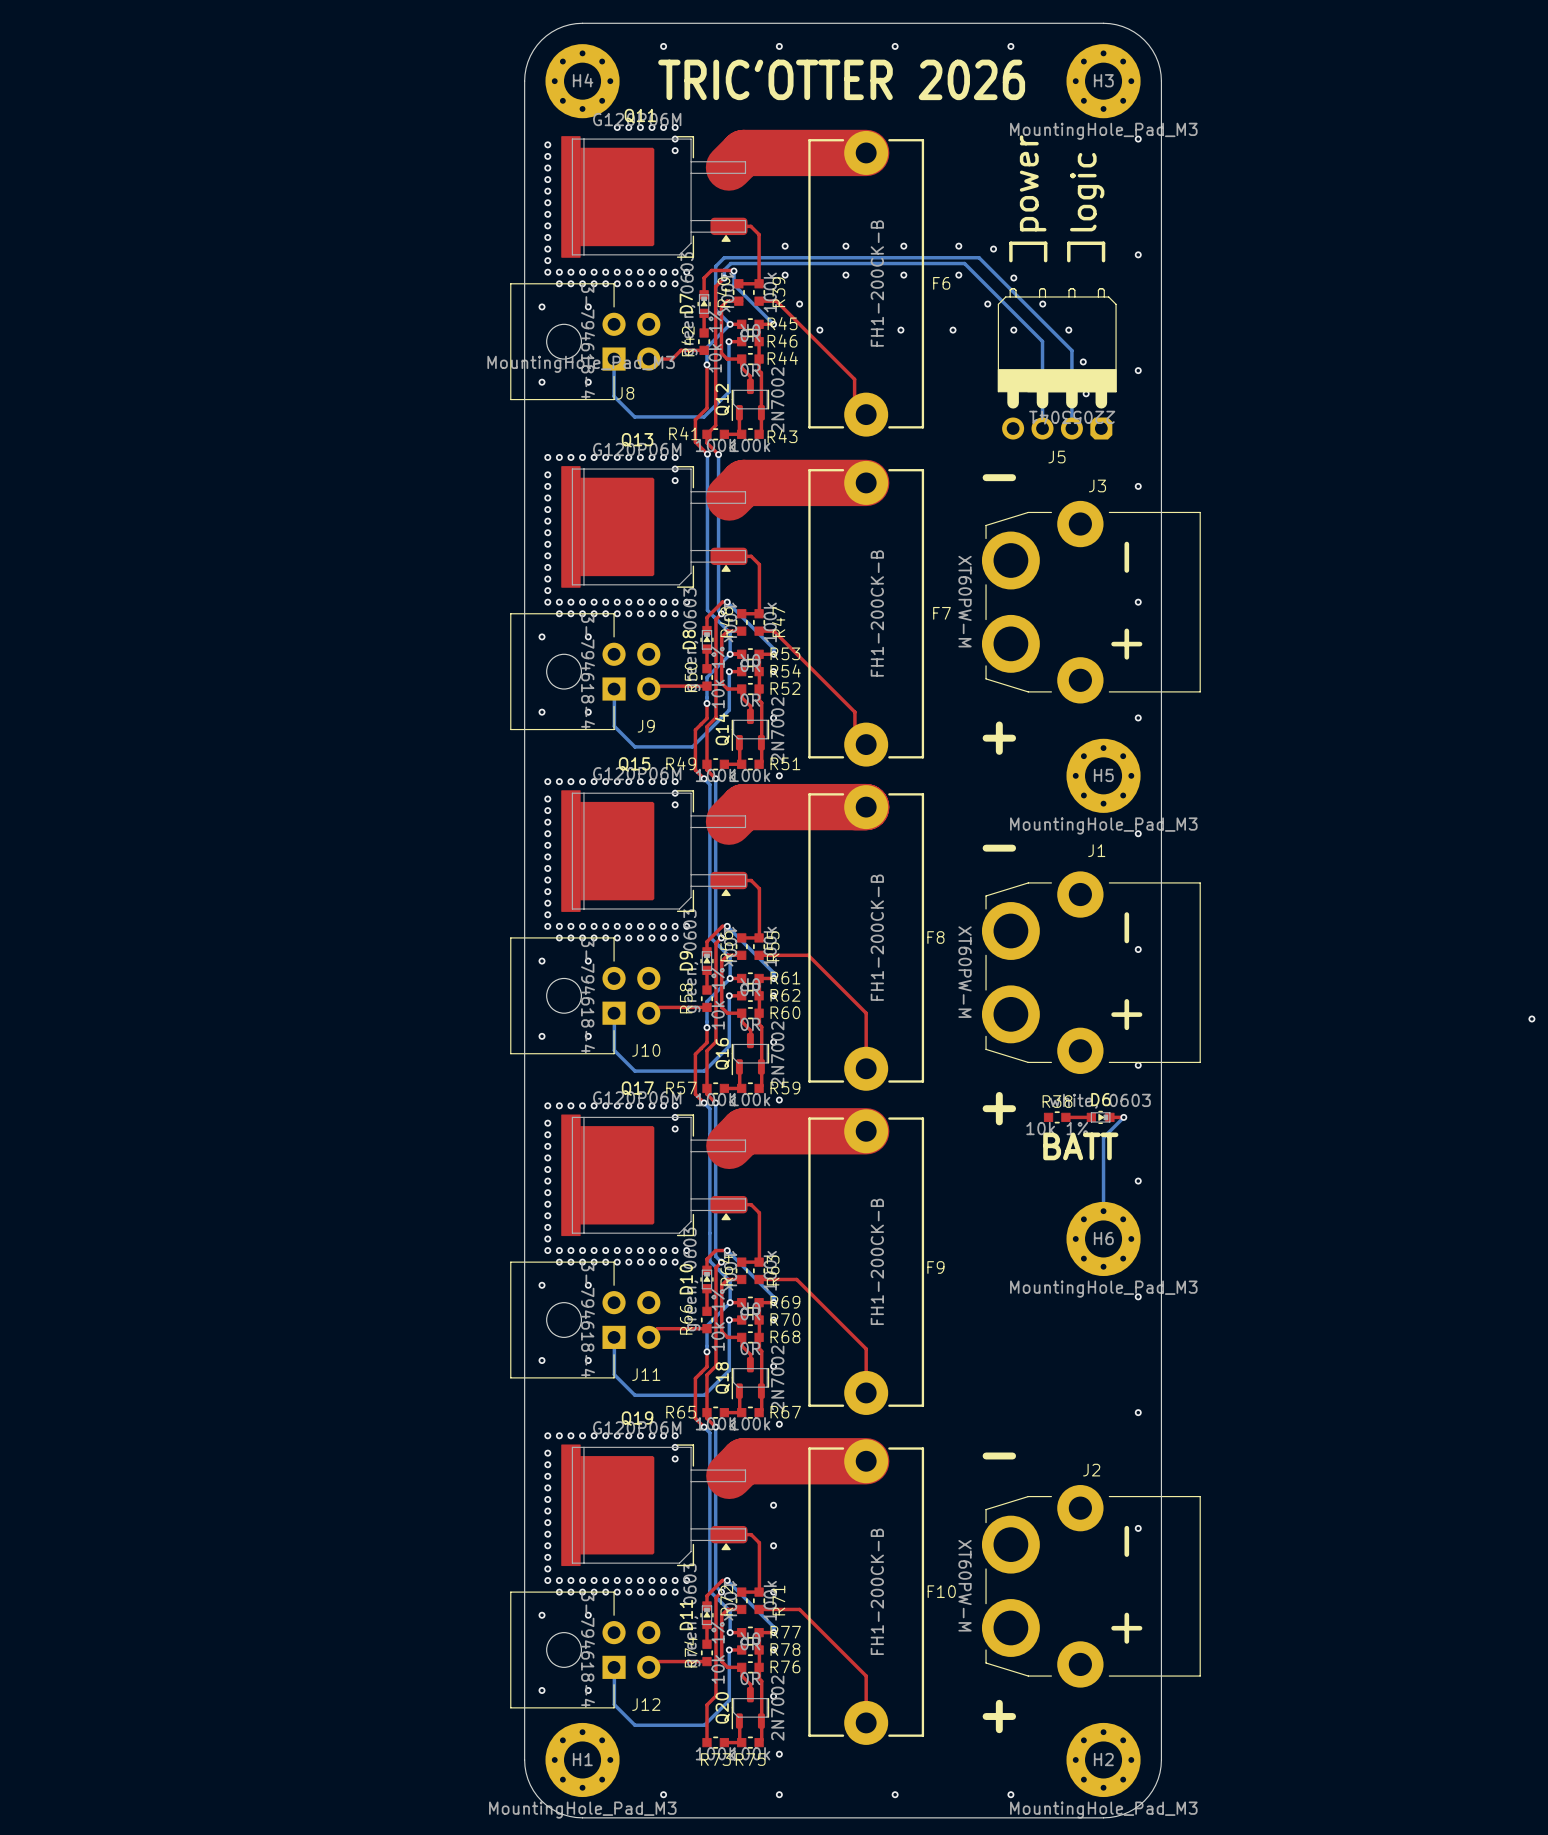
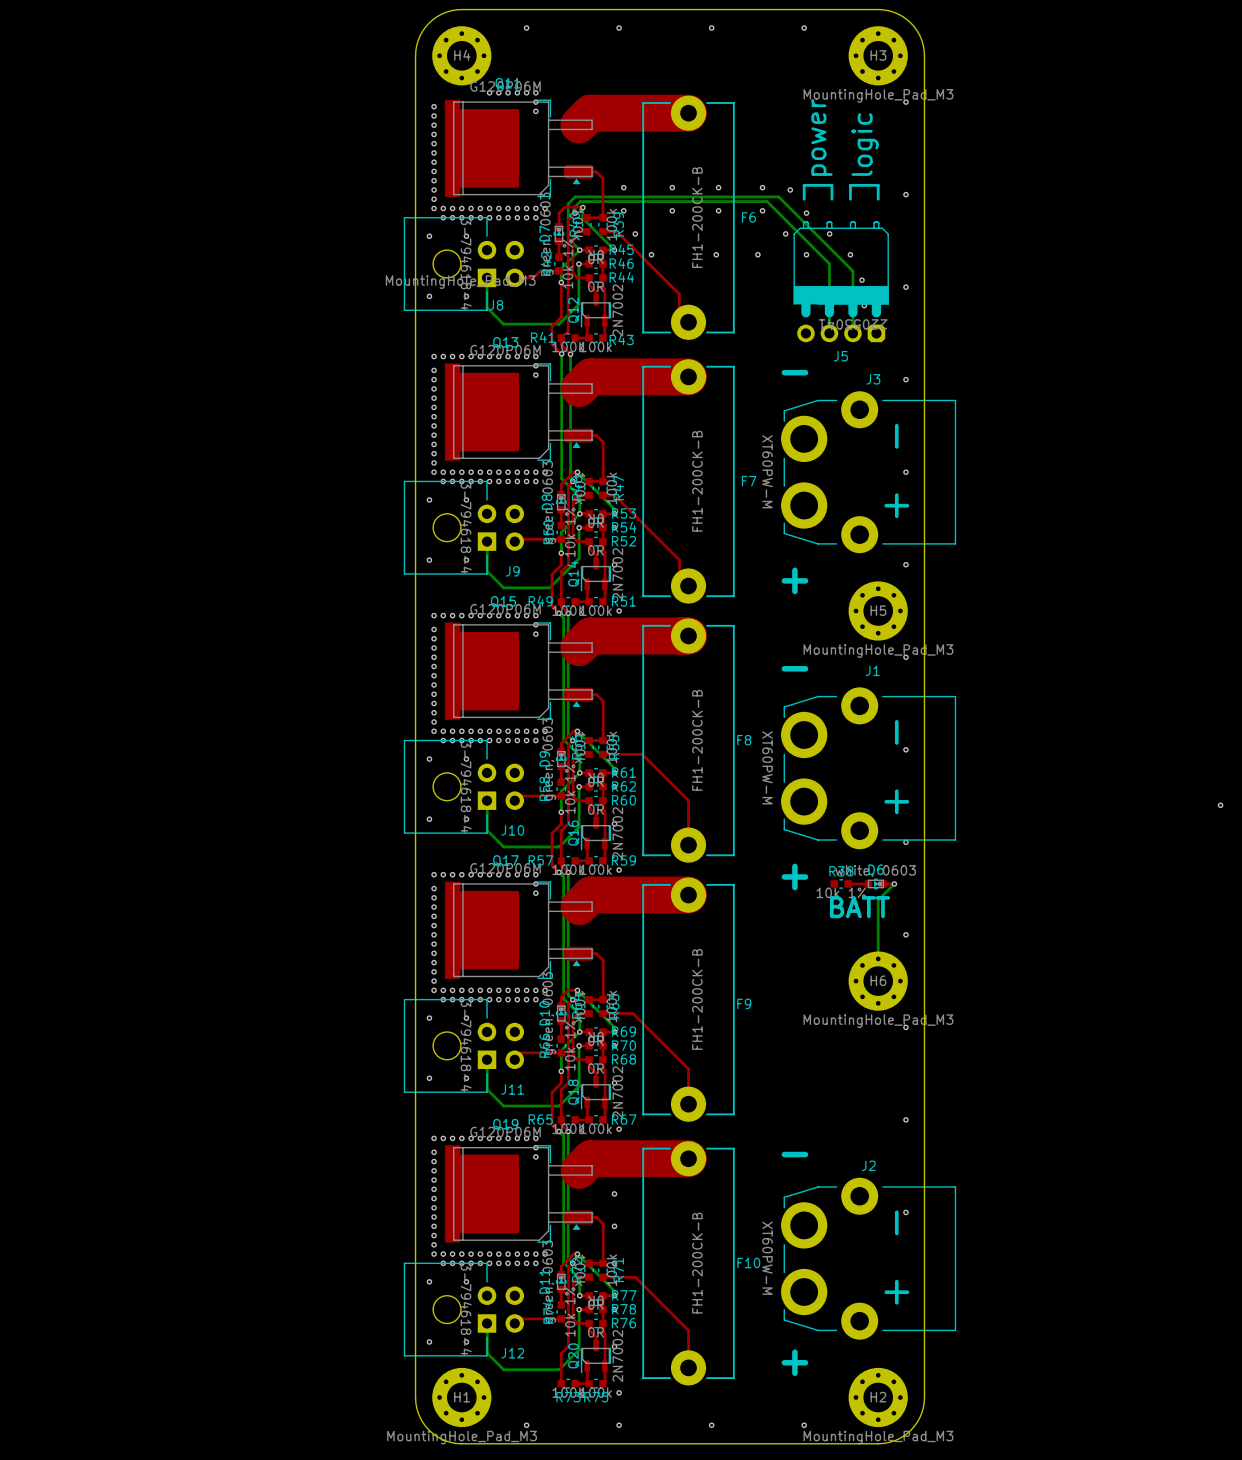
text: TRIC'OTTER 2026 (841, 79) -> none

